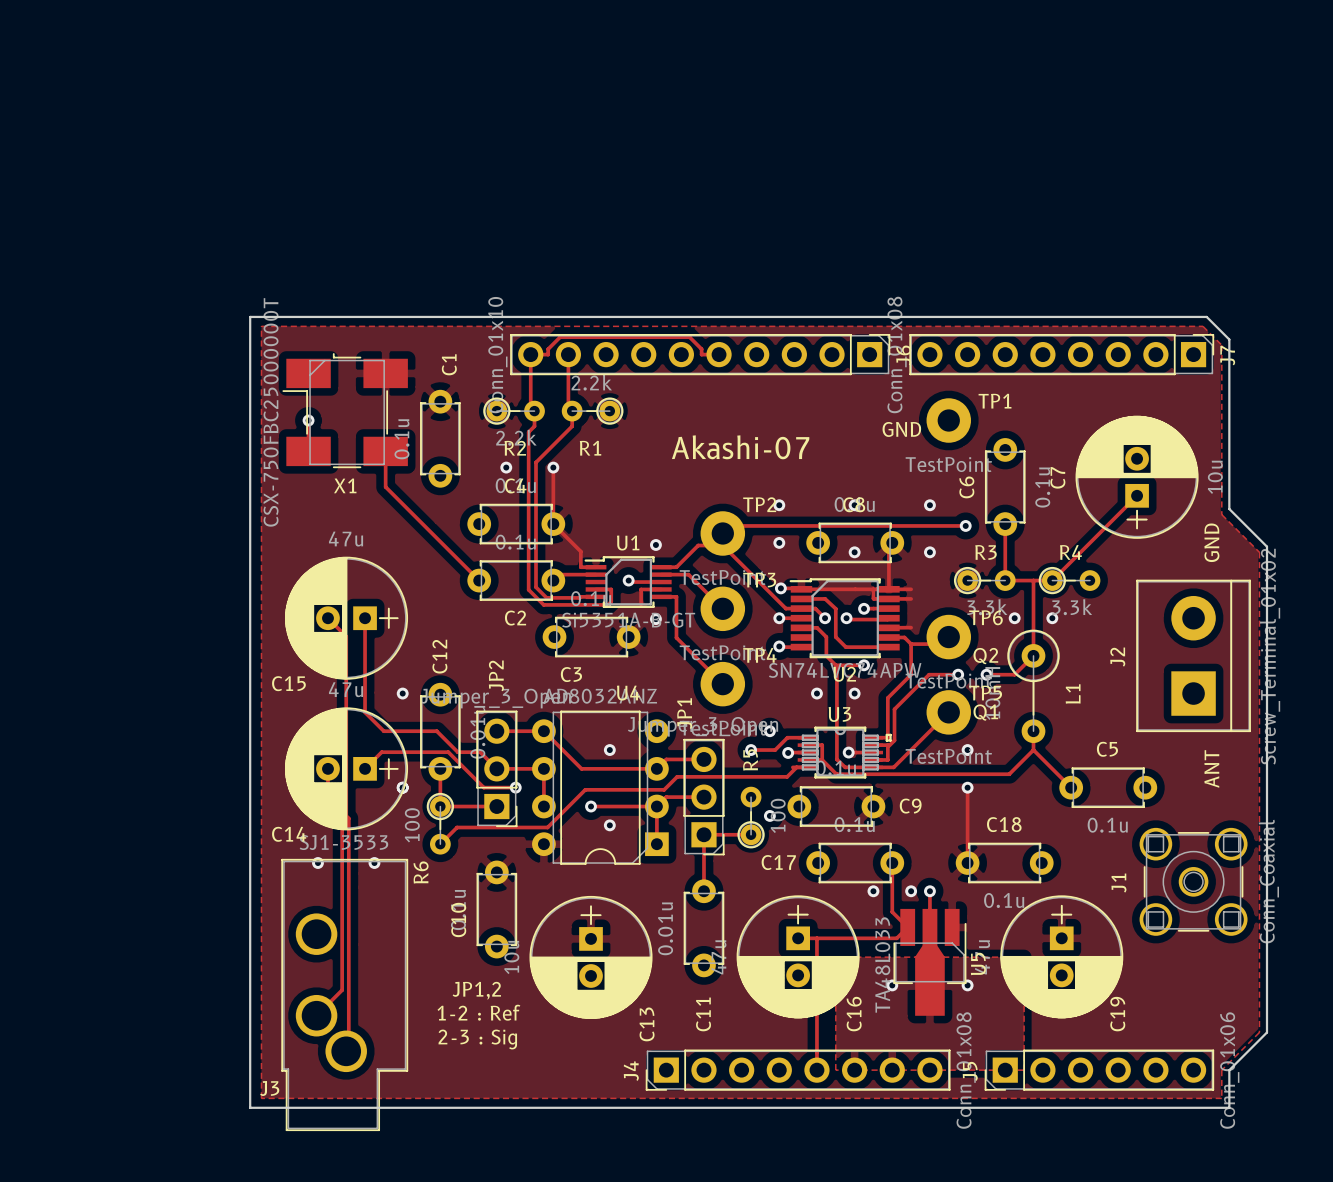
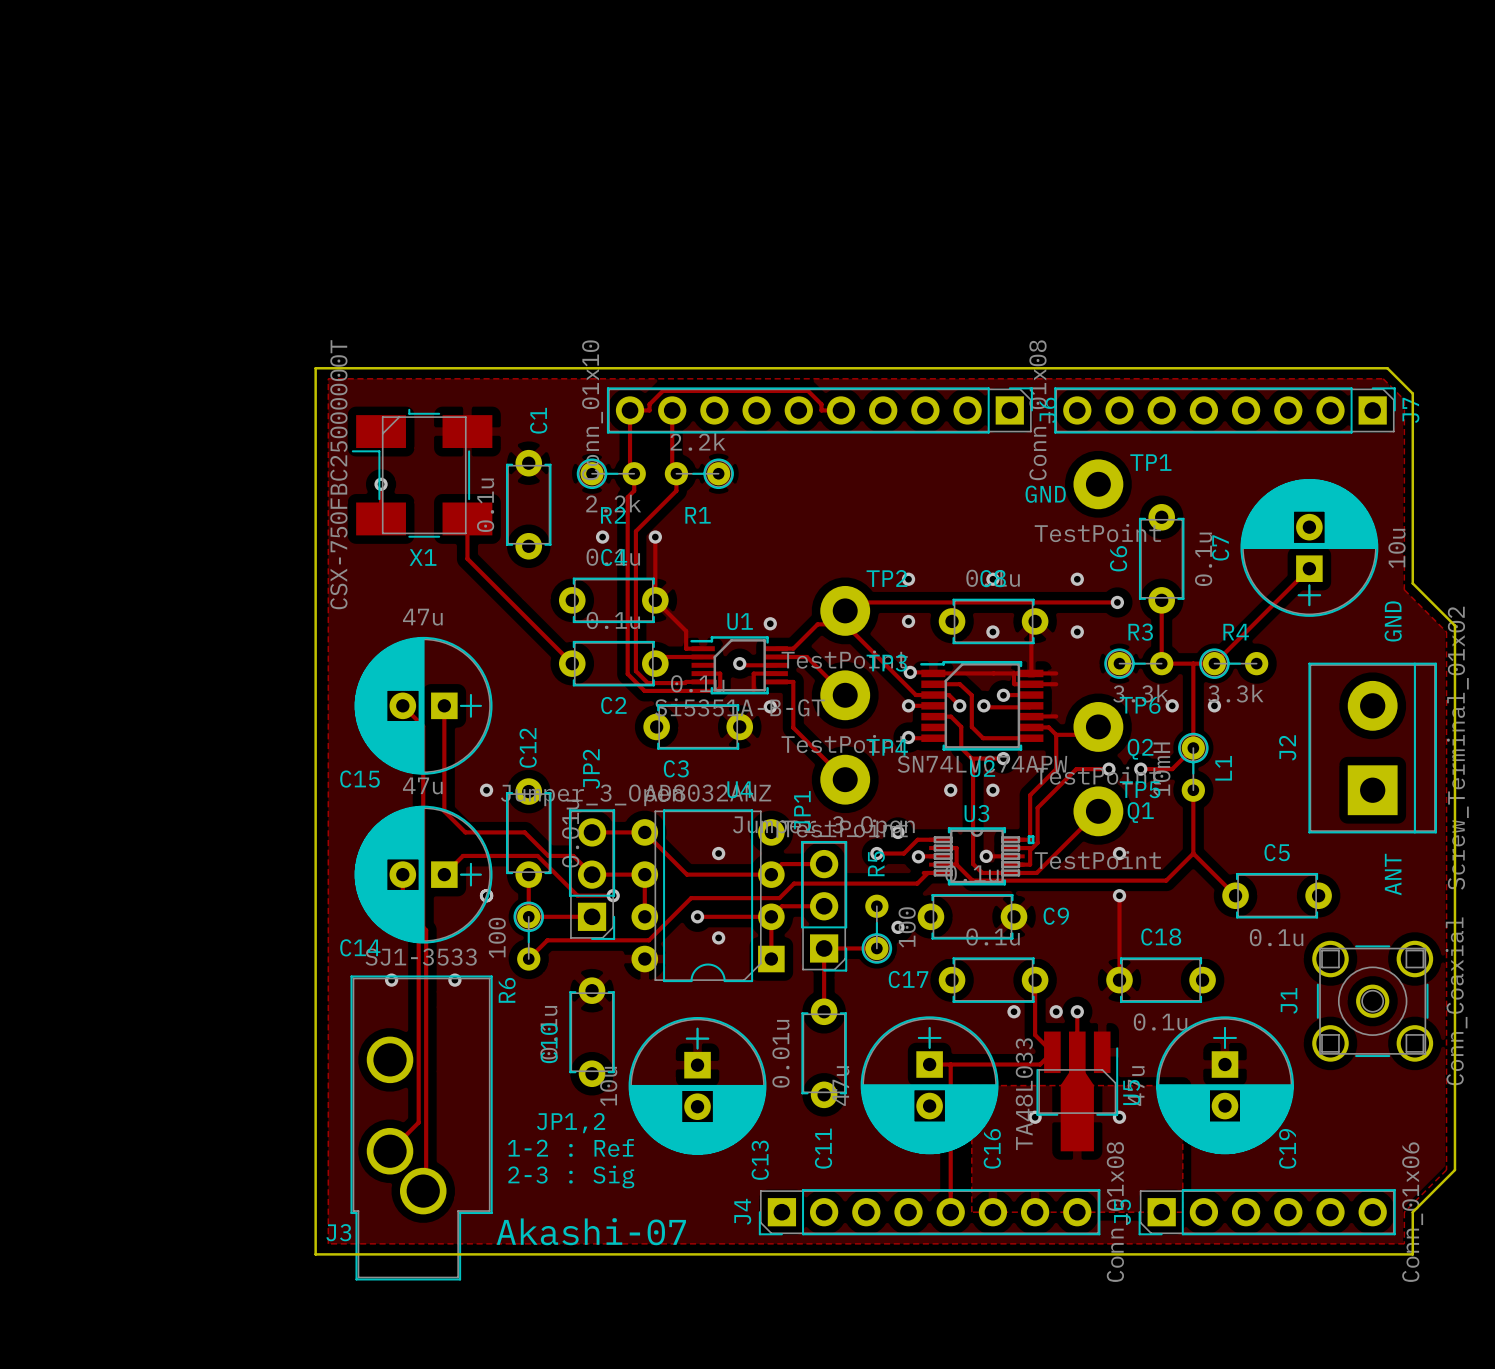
text: Akashi-07 (740, 447) -> none
L1 footprint: [1007, 629, 1060, 744] -> [1178, 732, 1209, 802]
track: none -> (1193, 790) (1193, 832)
text: none -> Akashi-07 (591, 1231)

